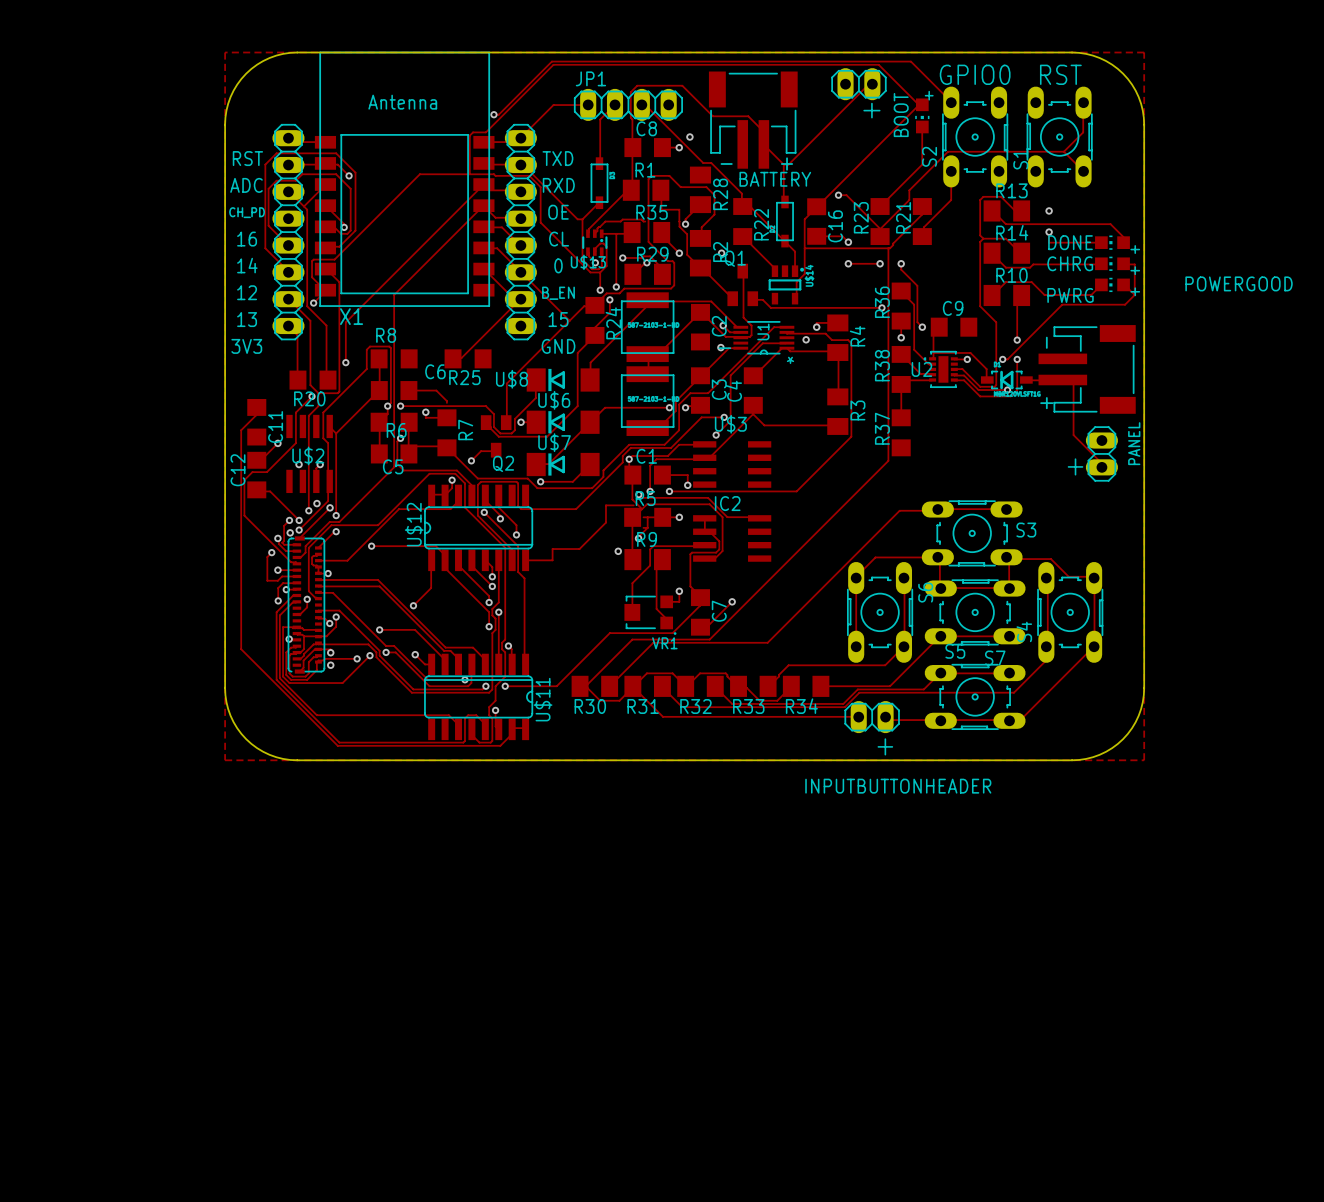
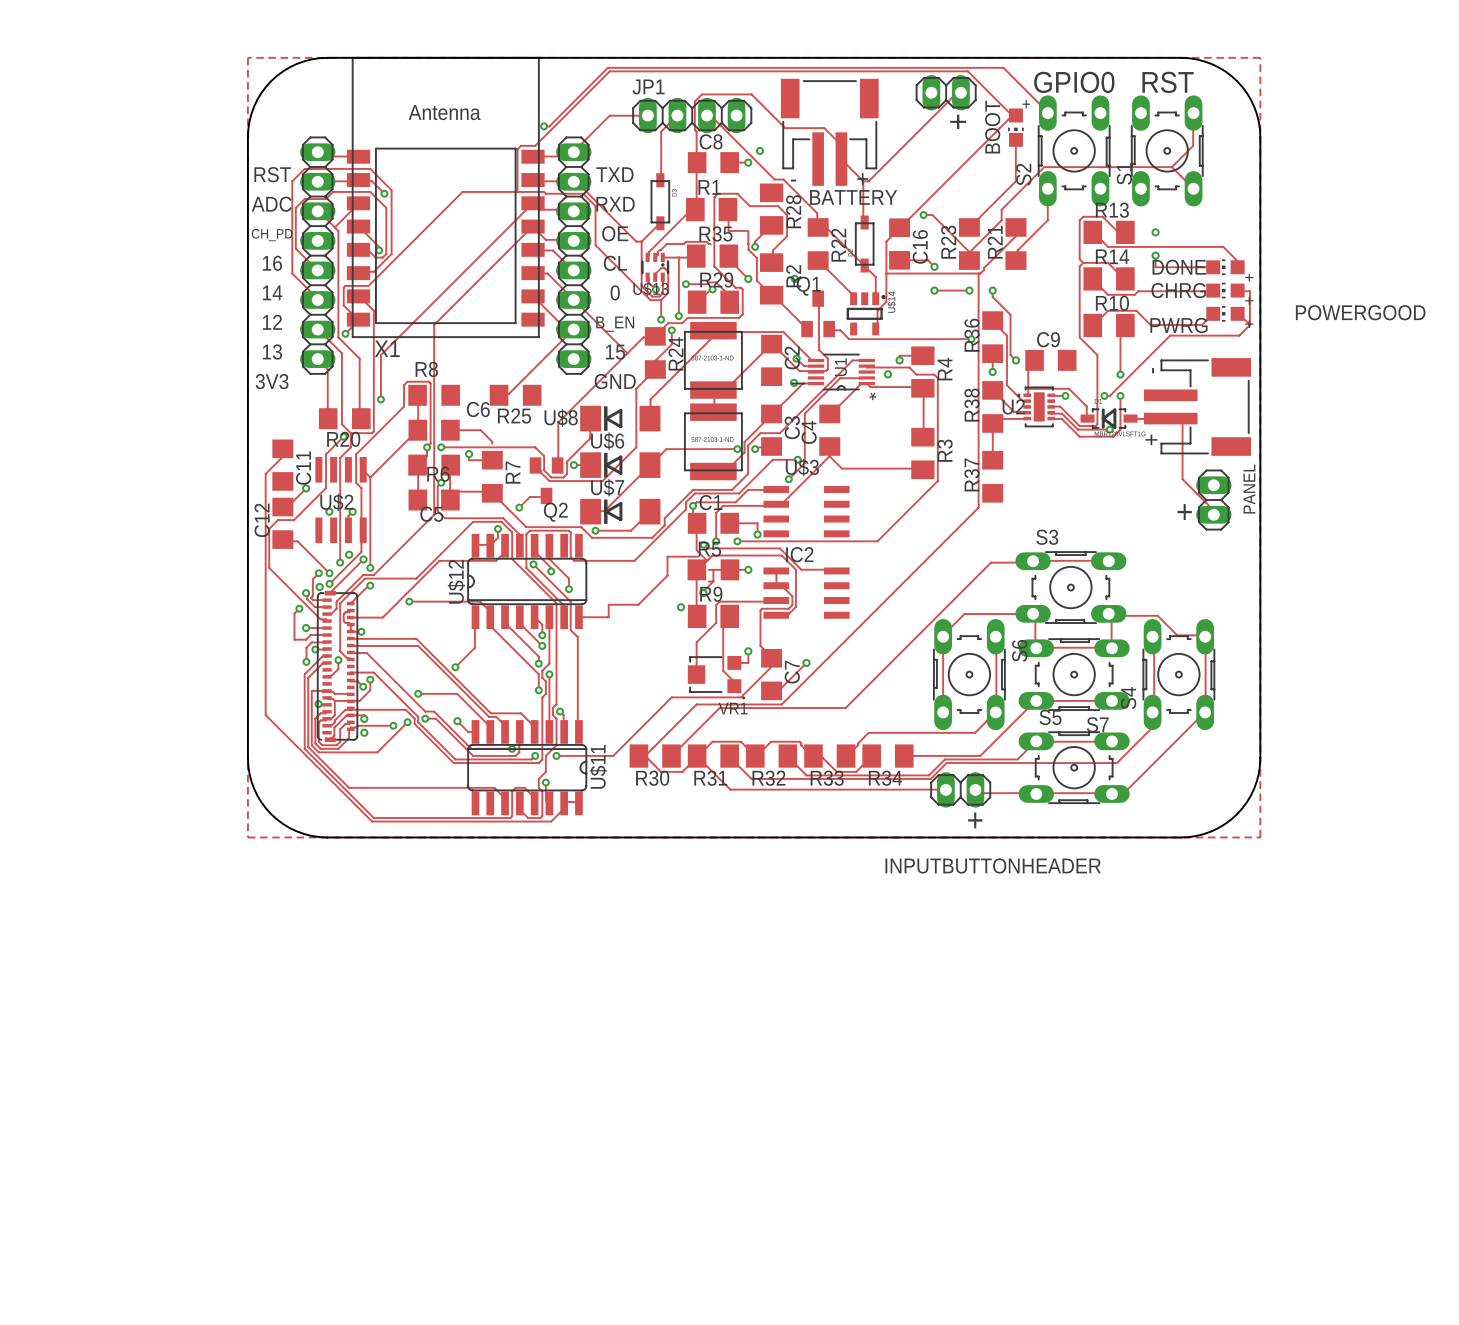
S3 name position: S3 (1026, 530) -> S3 (1047, 537)

